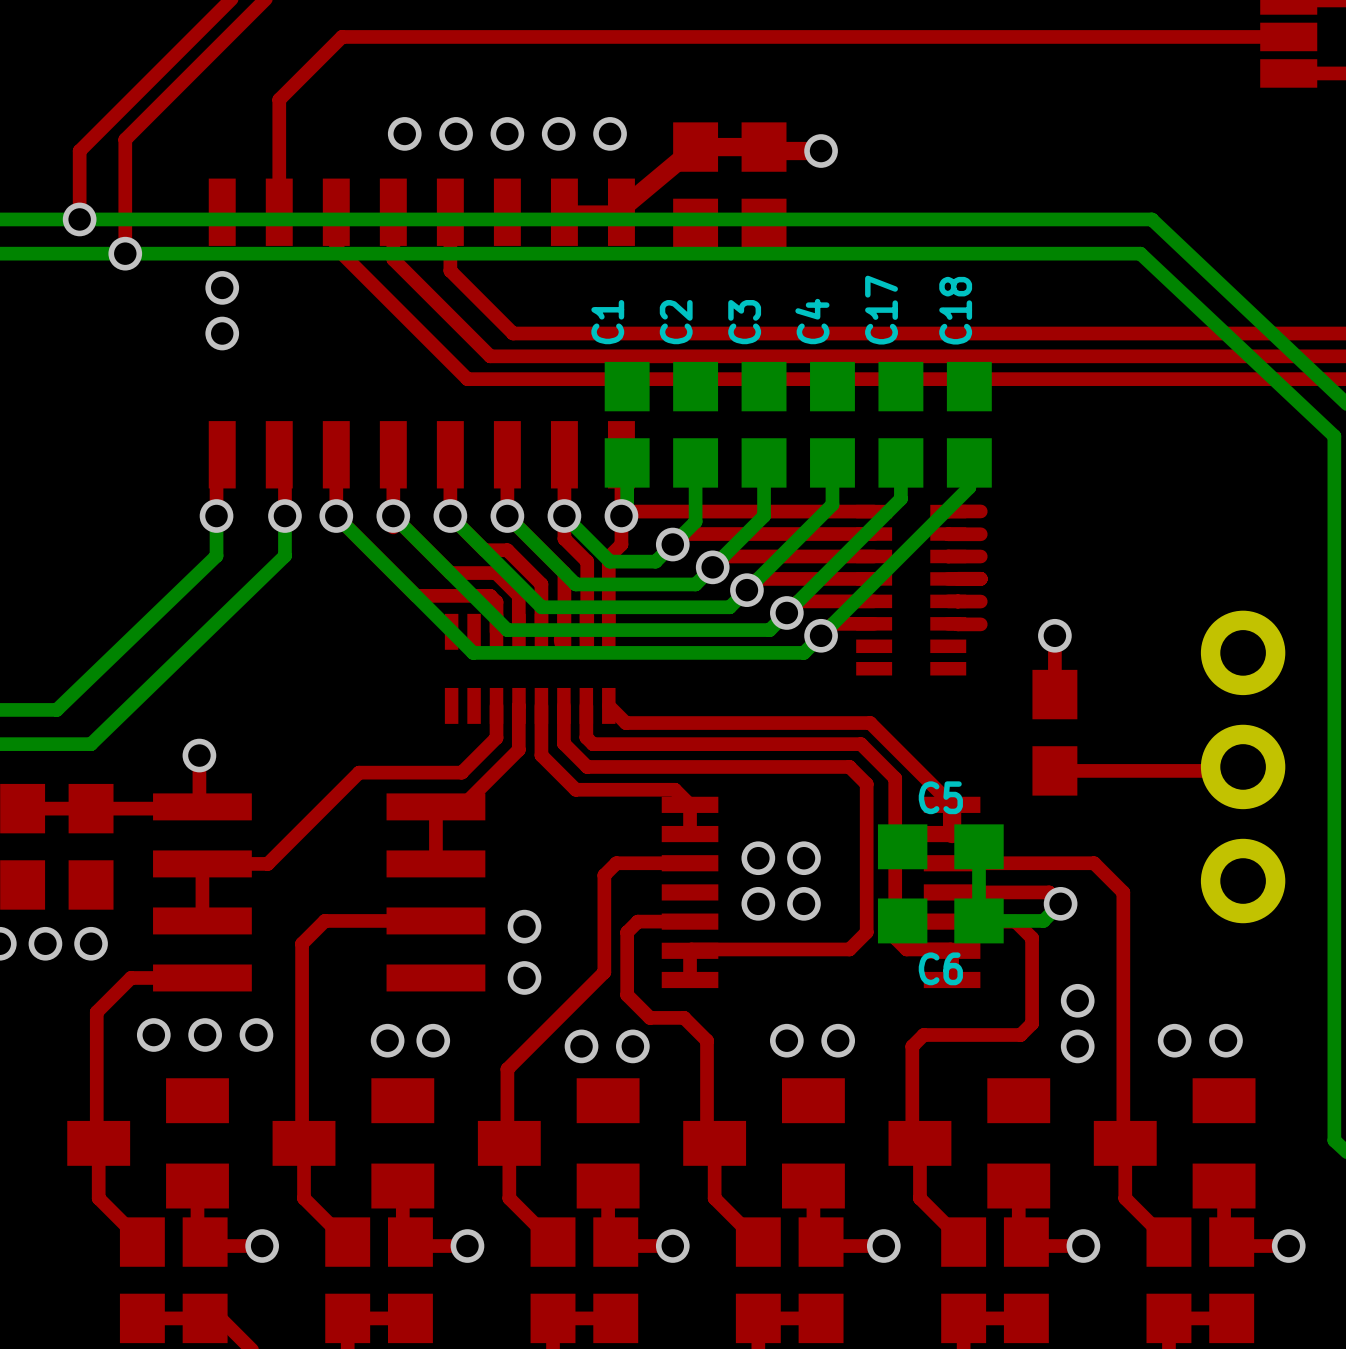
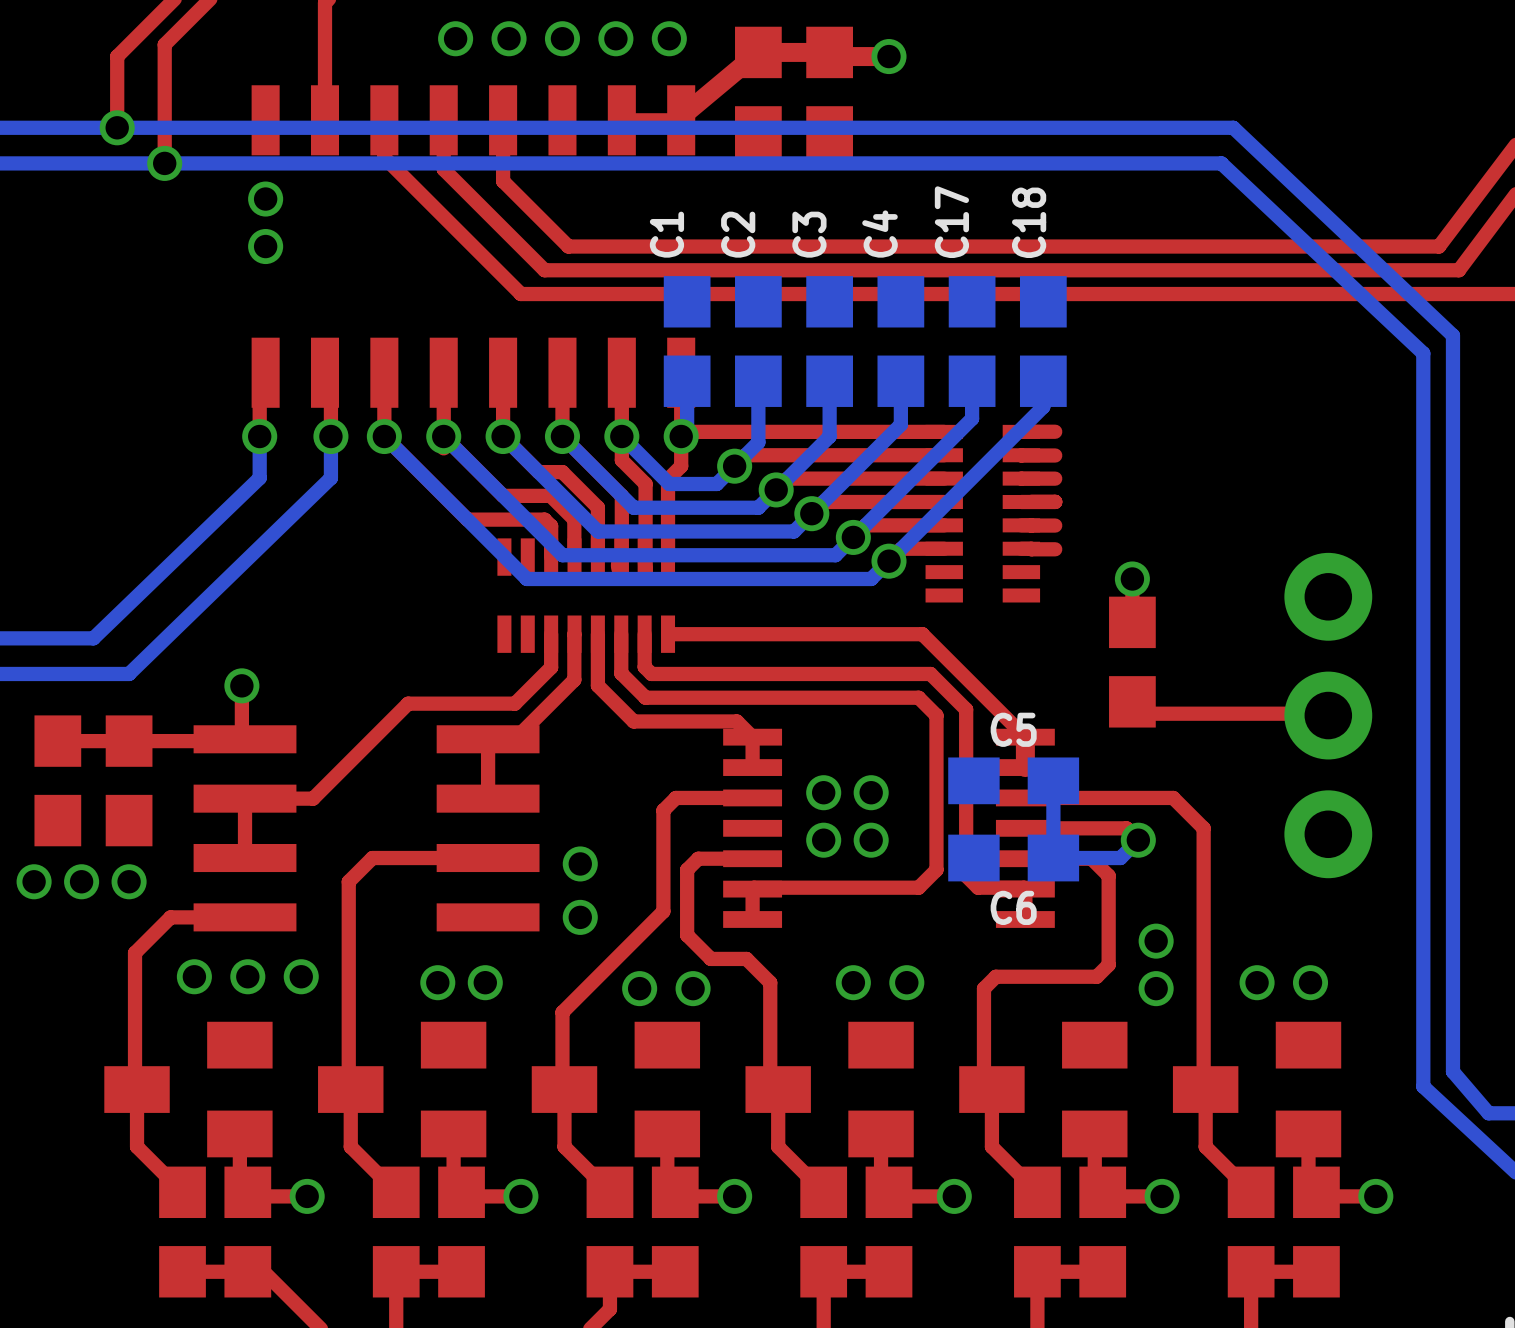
via position: (1054, 635) -> (1132, 578)
top track: (608, 705) (625, 723) (870, 723) -> (668, 634) (922, 634) (940, 652)
top track: (1243, 766) (1218, 770) (1054, 770) -> none
part position: (1243, 766) -> (1328, 715)
top track: none -> (1132, 713) (1314, 713) (1328, 715)

